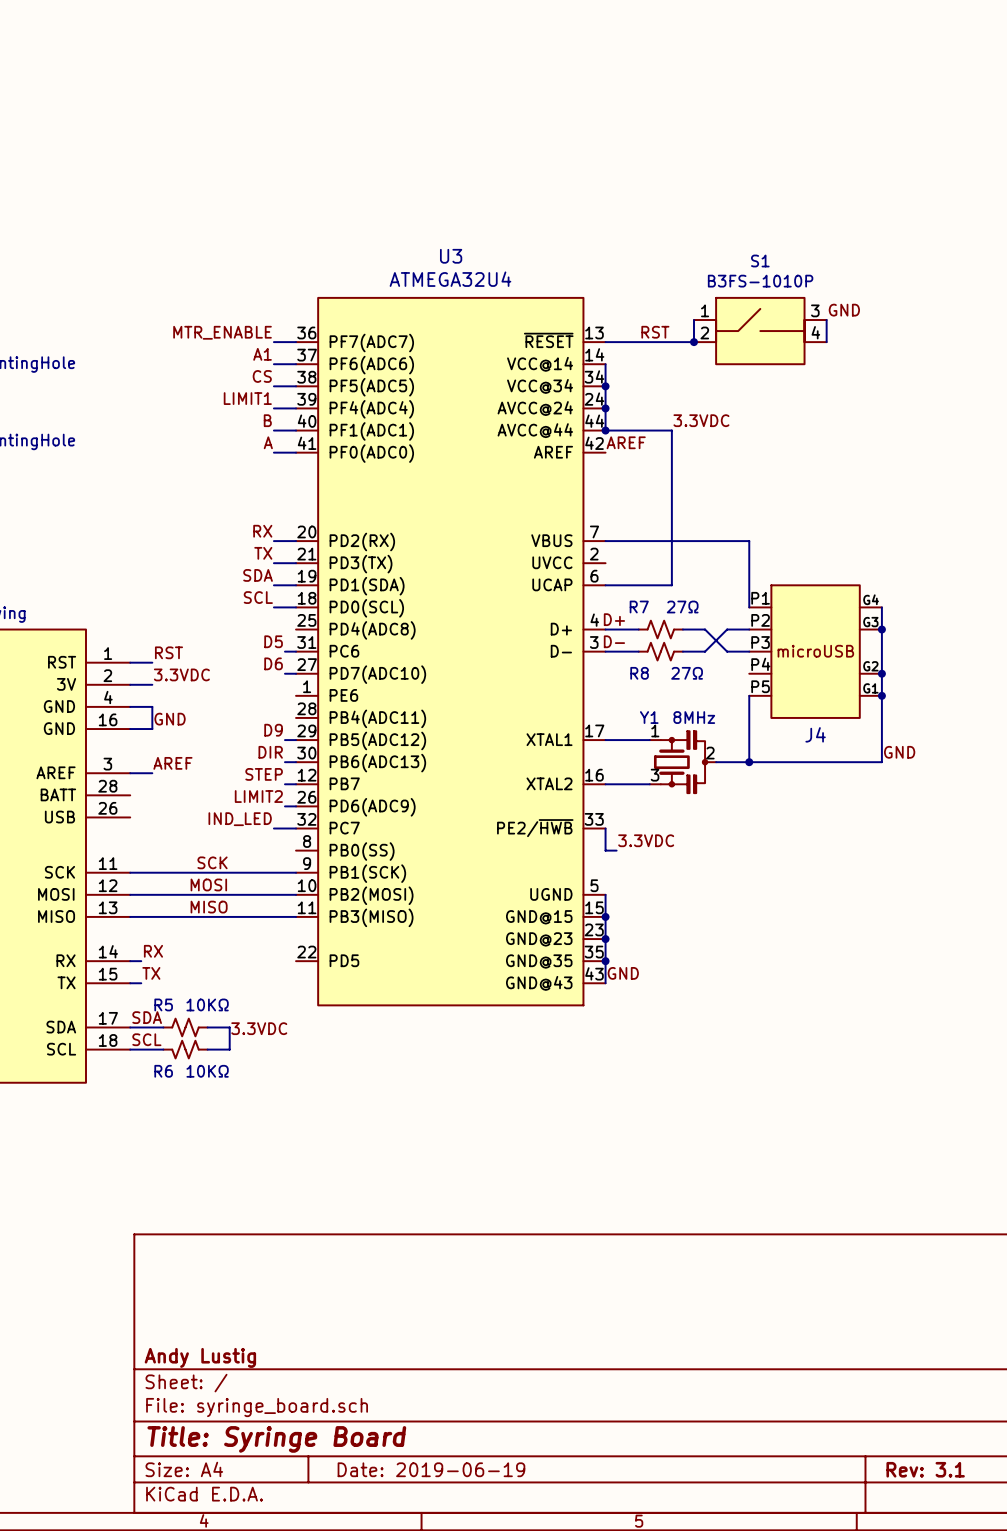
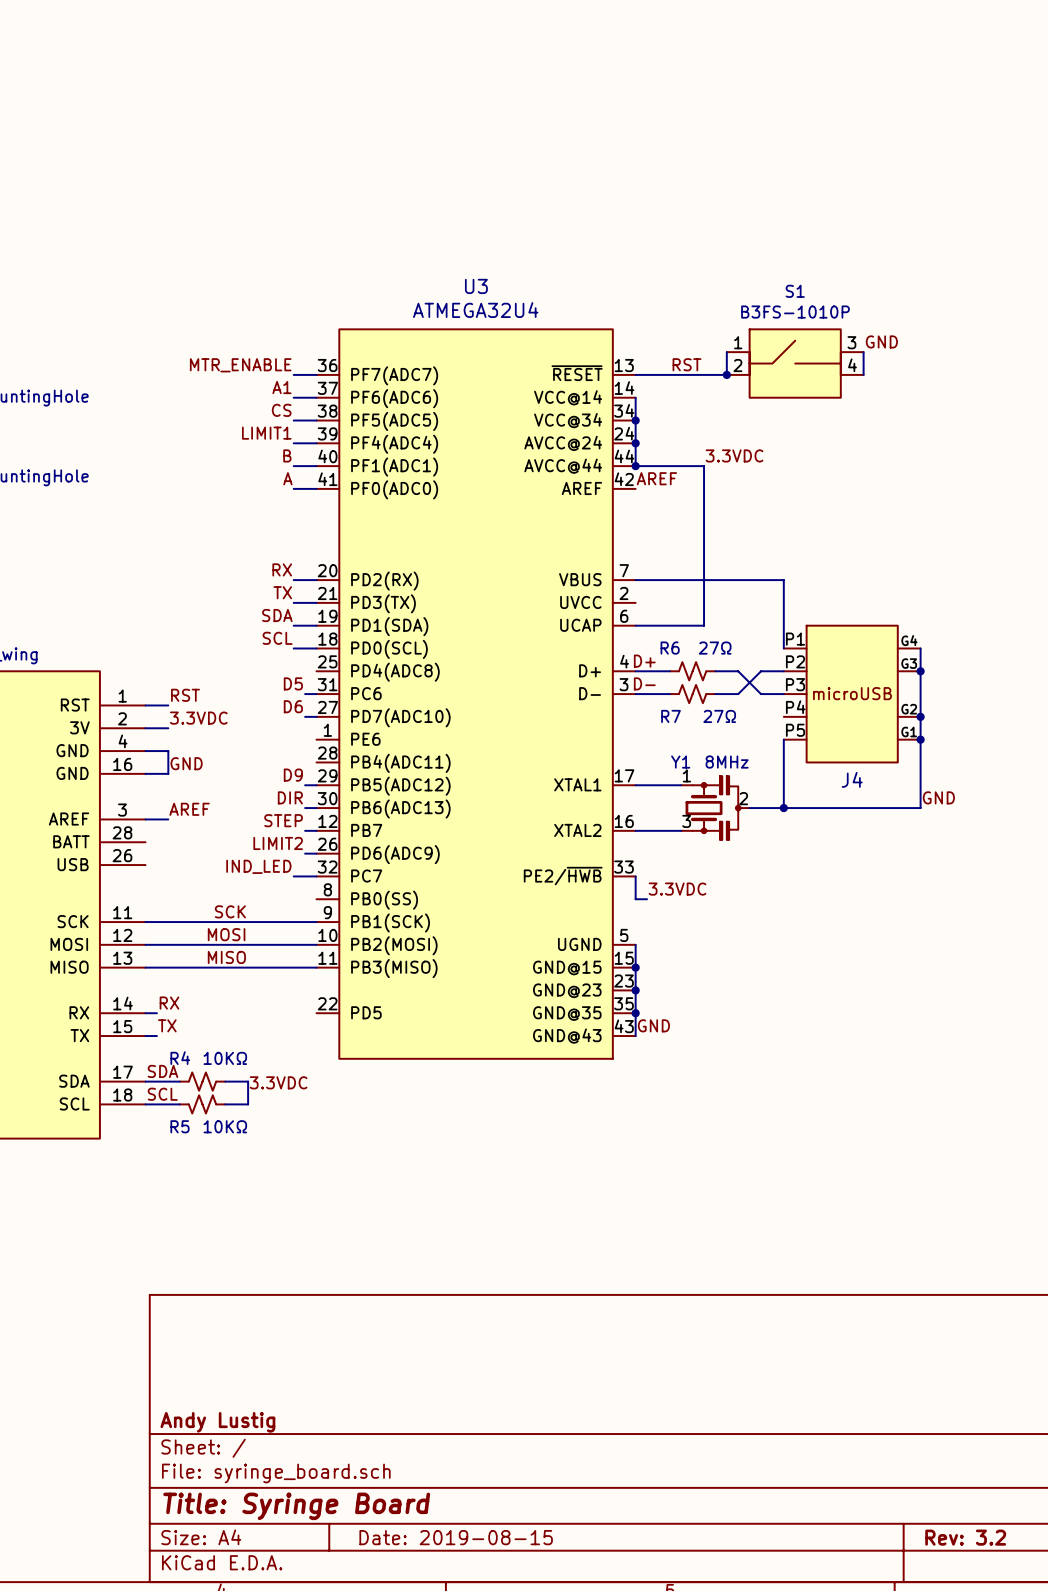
R7 name: R7 (639, 607) -> R6 (670, 648)
R8 name: R8 (639, 673) -> R7 (671, 716)
R5 name: R5 (163, 1004) -> R4 (180, 1058)
R6 name: R6 (163, 1071) -> R5 (179, 1126)
title block: Date: 2019-06-19 (431, 1469) -> Date: 2019-08-15 (456, 1537)
title block: Rev: 3.1 (925, 1469) -> Rev: 3.2 (965, 1537)

